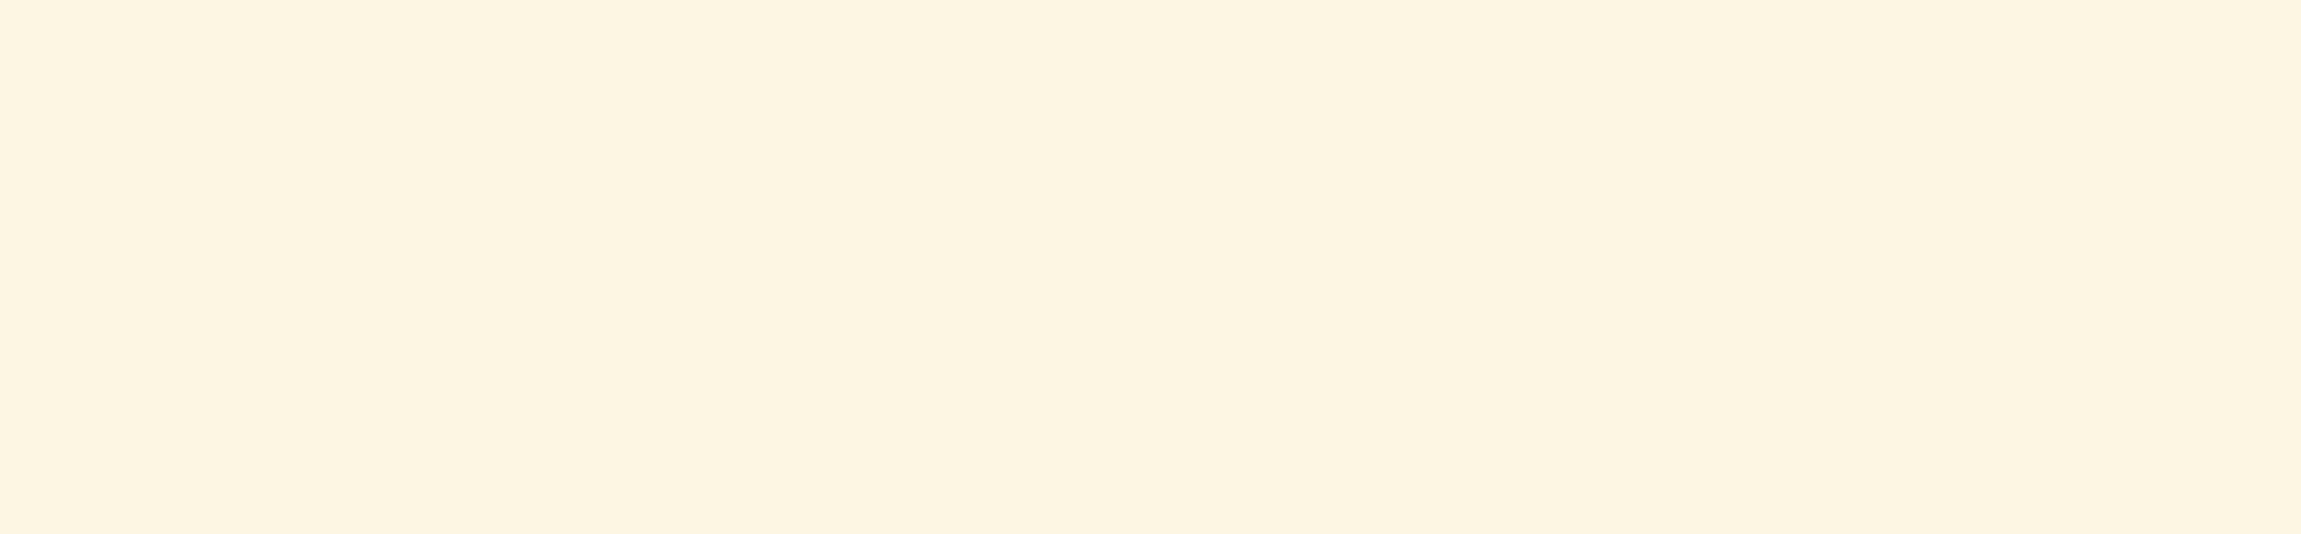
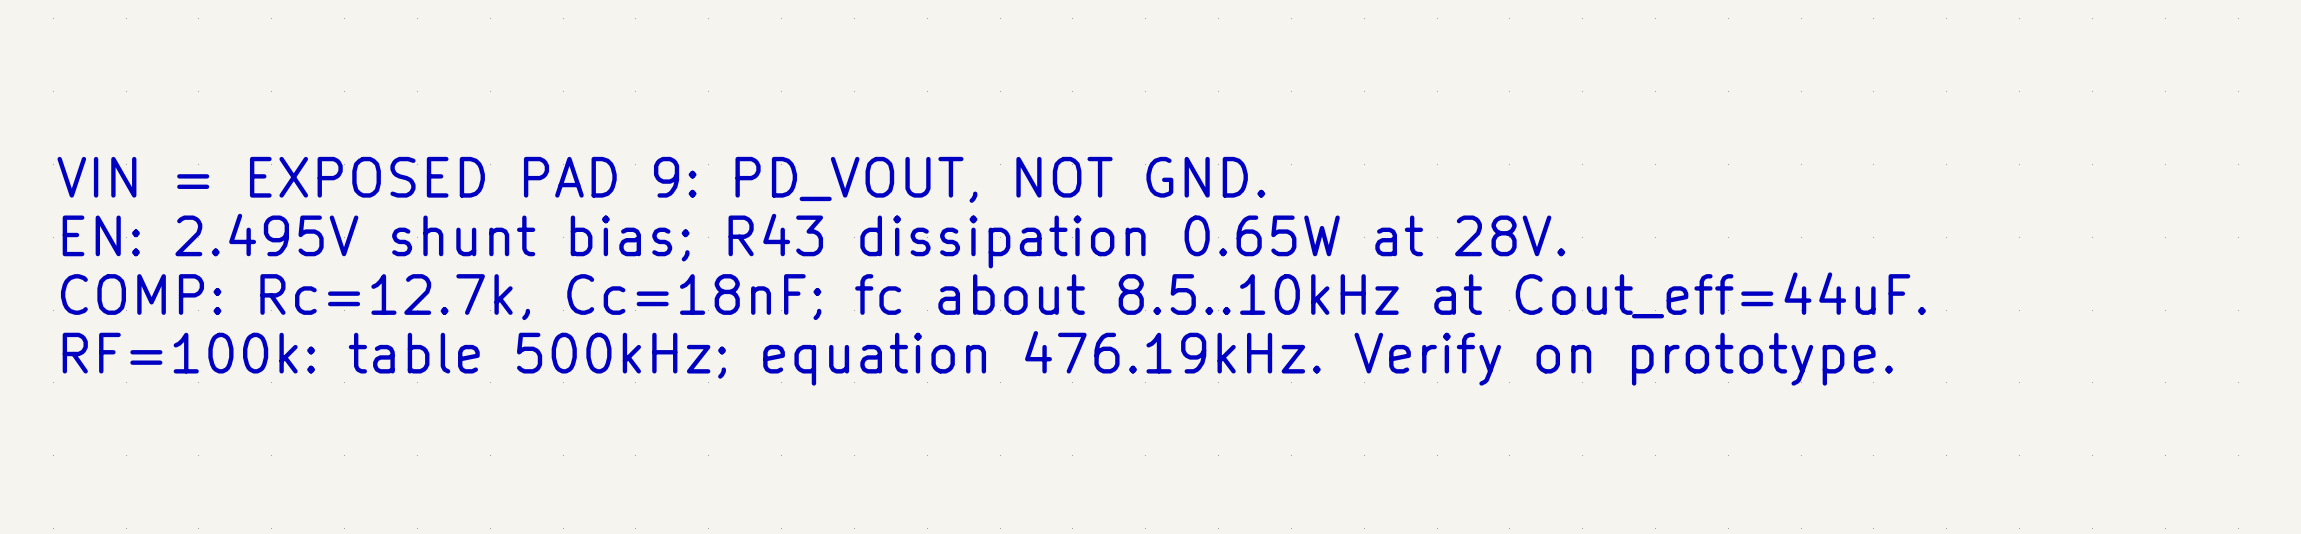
text: none -> VIN = EXPOSED PAD 9: PD_VOUT, NOT GND. (661, 179)
text: none -> EN: 2.495V shunt bias; R43 dissipation 0.65W at 28V. (813, 241)
text: none -> COMP: Rc=12.7k, Cc=18nF; fc about 8.5..10kHz at Cout_eff=44uF. (993, 296)
text: none -> RF=100k: table 500kHz; equation 476.19kHz. Verify on prototype. (977, 358)

